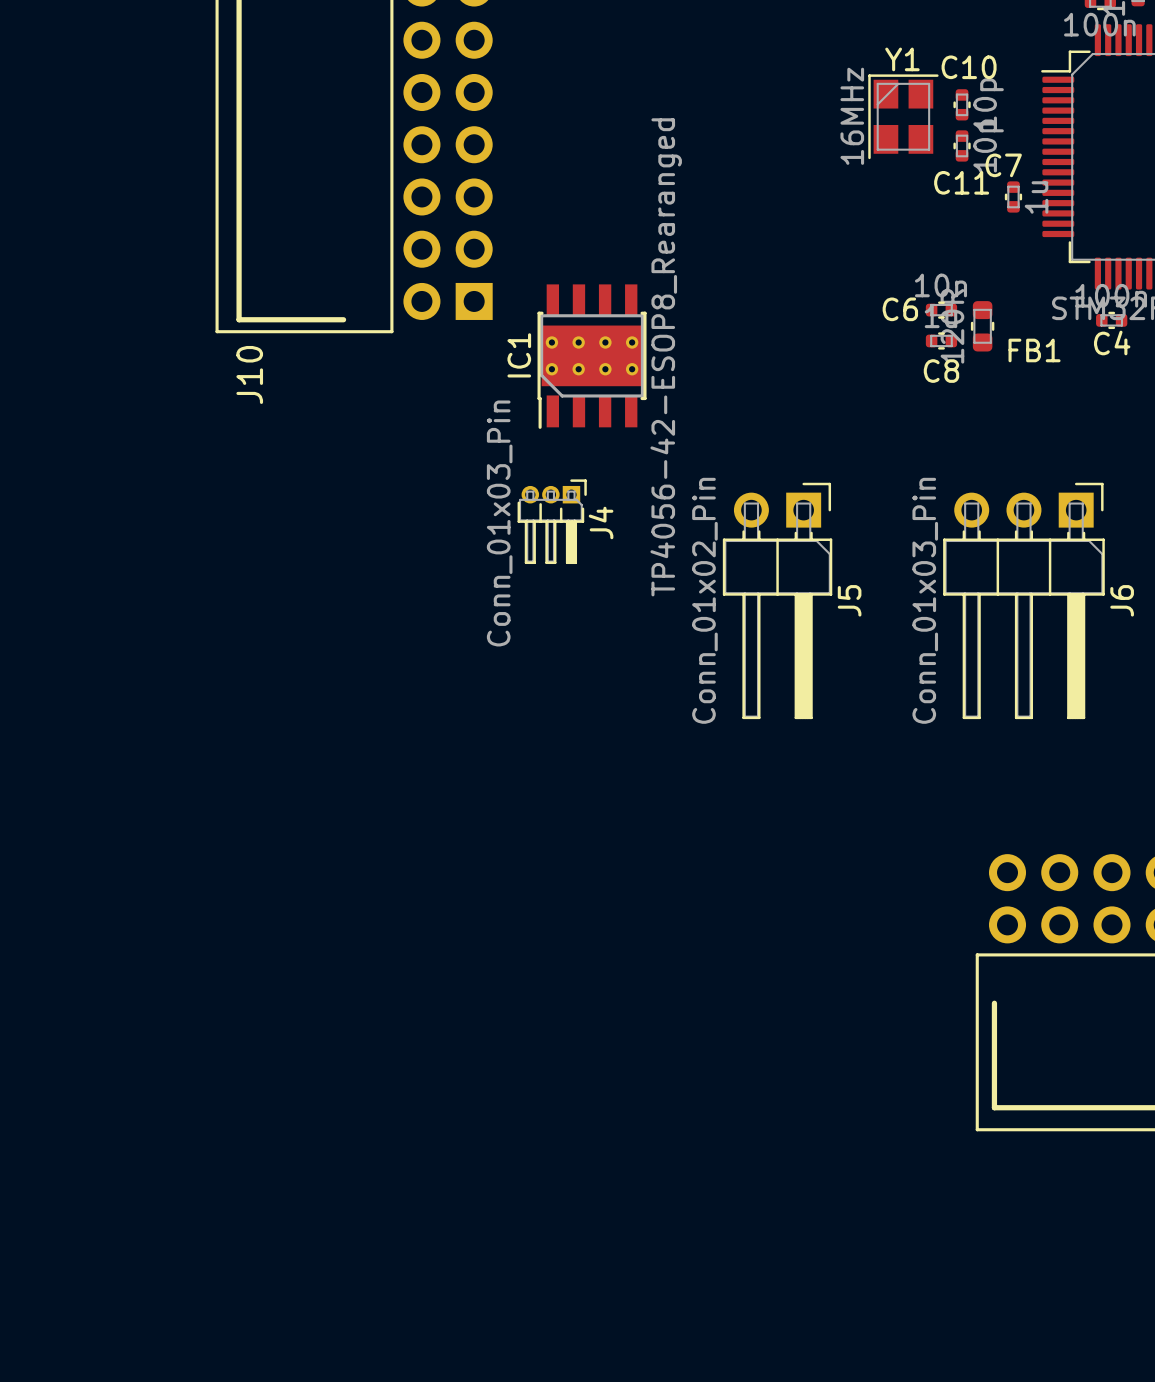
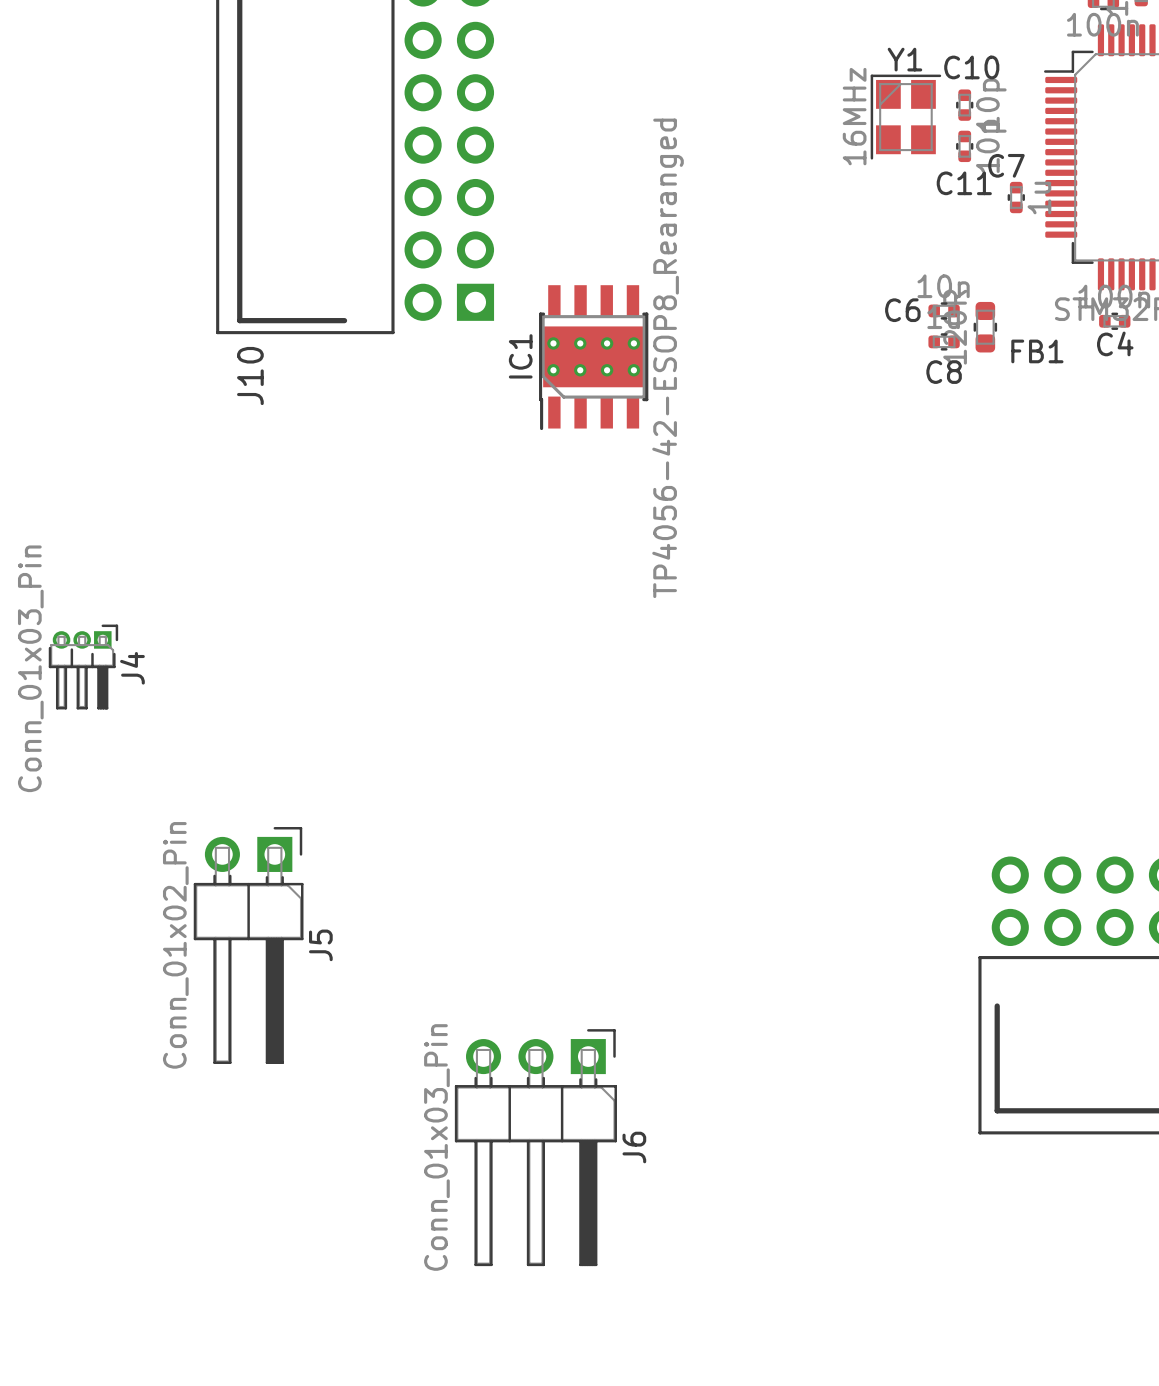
J4 position: (552, 521) -> (83, 667)
J5 position: (777, 600) -> (248, 945)
J6 position: (1023, 600) -> (535, 1147)

